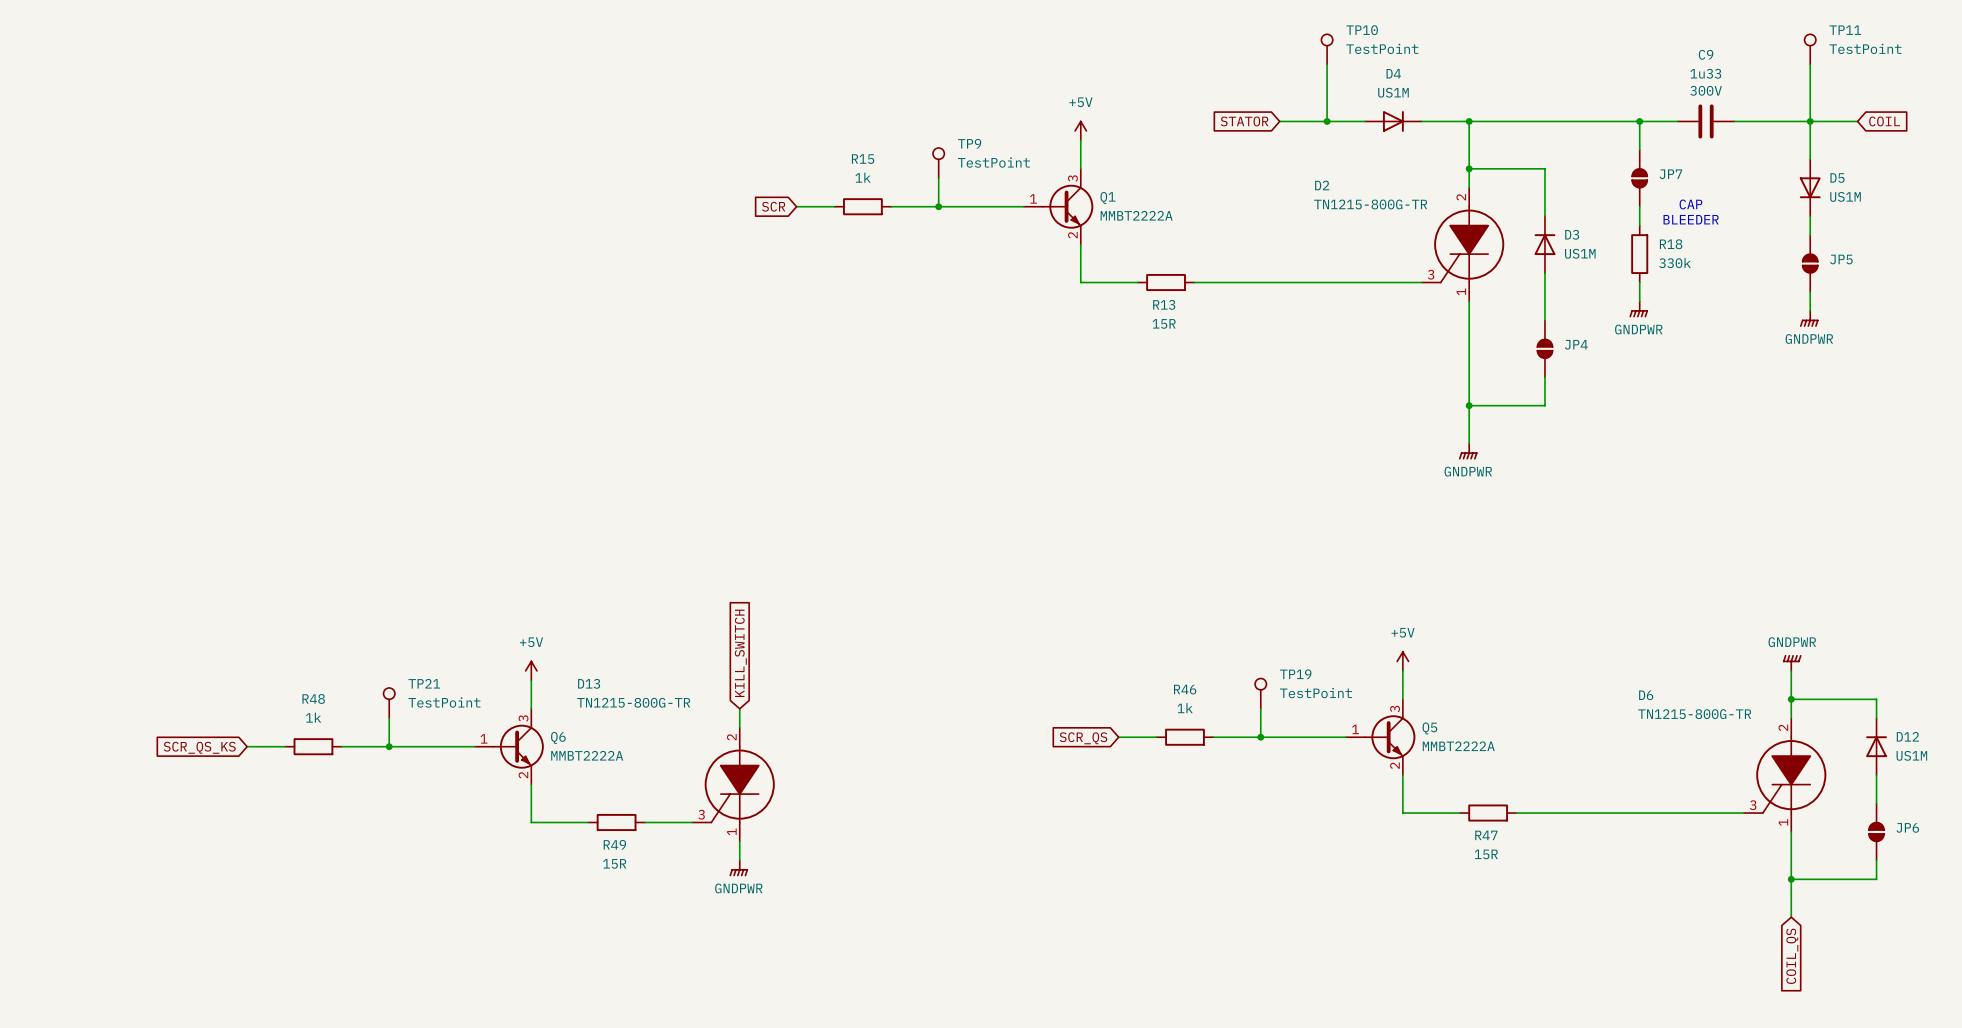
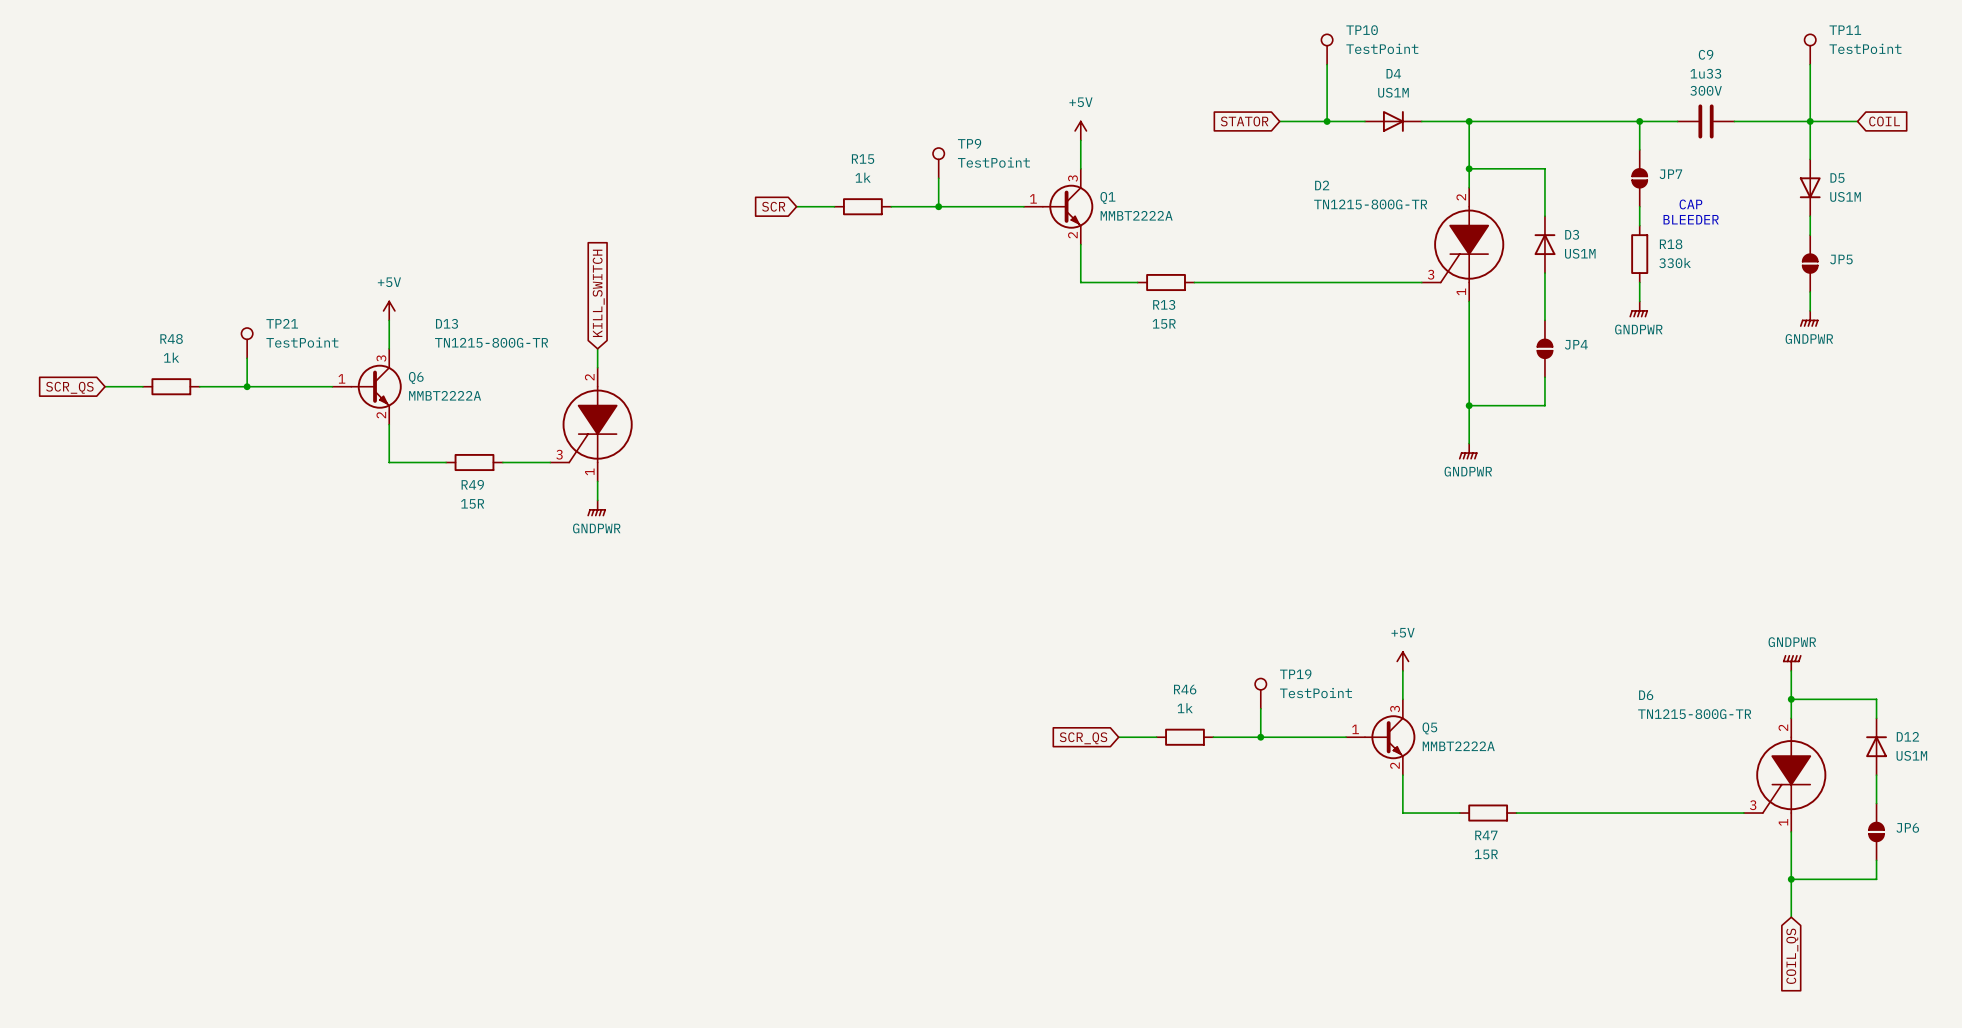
global label: none -> KILL_SWITCH (598, 293)
power symbol: none -> +5V (389, 310)
wire: none -> (389, 320) (389, 348)
wire: none -> (597, 348) (597, 367)
wire: none -> (247, 358) (247, 386)
wire: none -> (105, 386) (142, 386)
wire: none -> (199, 386) (332, 386)
junction: none -> (247, 386)
global label: none -> SCR_QS (69, 387)
wire: none -> (389, 424) (389, 462) (446, 462)
wire: none -> (502, 462) (550, 462)
wire: none -> (597, 481) (597, 500)
power symbol: none -> GNDPWR (596, 508)
global label: KILL_SWITCH (740, 653) -> none
power symbol: +5V (531, 670) -> none
wire: (531, 680) (531, 708) -> none
TP21 position: (389, 703) -> (247, 343)
wire: (739, 708) (739, 727) -> none
wire: (389, 718) (389, 746) -> none
wire: (247, 746) (285, 746) -> none
R48 position: (313, 746) -> (171, 386)
wire: (341, 746) (474, 746) -> none
junction: (389, 746) -> none
Q6 position: (509, 746) -> (367, 386)
global label: SCR_QS_KS (199, 747) -> none
wire: (531, 784) (531, 822) (588, 822) -> none
D13 position: (733, 784) -> (591, 424)
R49 position: (616, 822) -> (474, 462)
wire: (645, 822) (692, 822) -> none
wire: (739, 841) (739, 860) -> none
power symbol: GNDPWR (738, 868) -> none

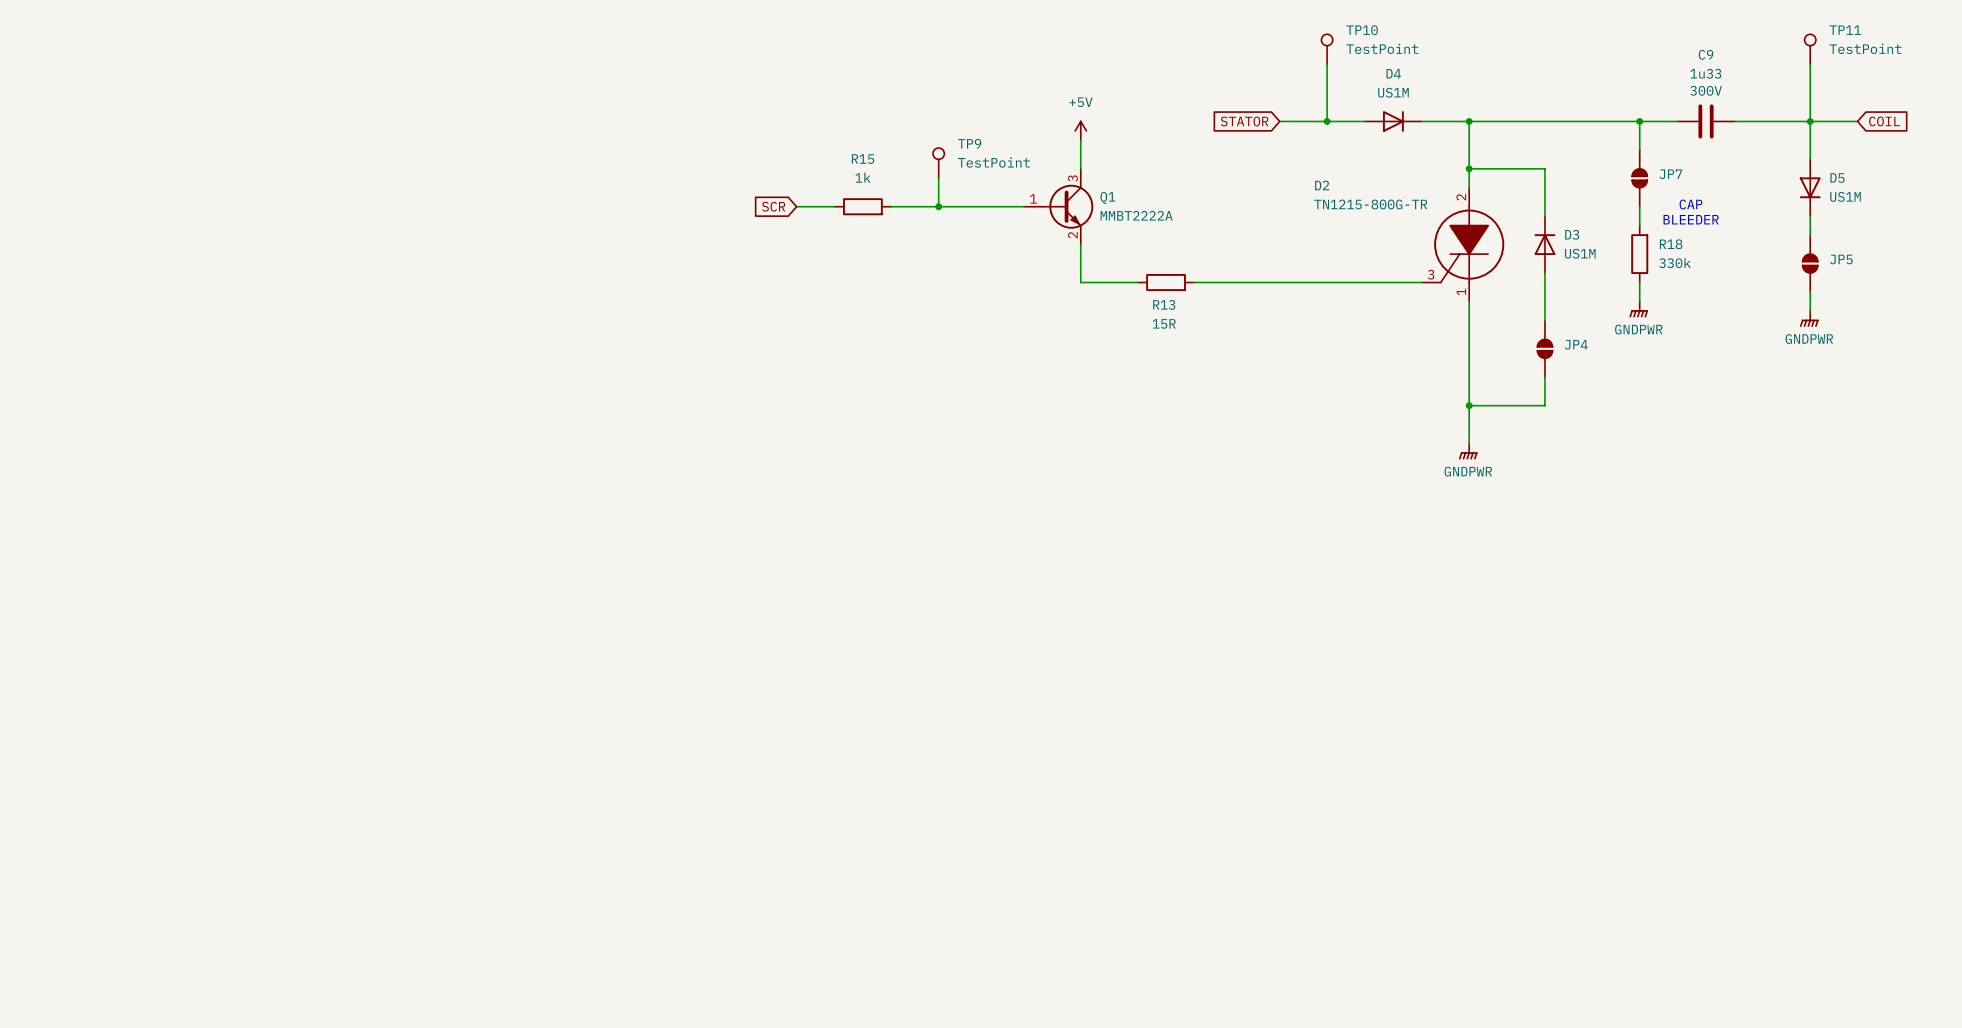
global label: KILL_SWITCH (598, 293) -> none
power symbol: +5V (389, 310) -> none
wire: (389, 320) (389, 348) -> none
TP21: TestPoint (247, 343) -> none
wire: (597, 348) (597, 367) -> none
wire: (247, 358) (247, 386) -> none
wire: (105, 386) (142, 386) -> none
R48: 1k (171, 386) -> none
wire: (199, 386) (332, 386) -> none
junction: (247, 386) -> none
Q6: MMBT2222A (367, 386) -> none
global label: SCR_QS (69, 387) -> none
wire: (389, 424) (389, 462) (446, 462) -> none
D13: TN1215-800G-TR (591, 424) -> none
R49: 15R (474, 462) -> none
wire: (502, 462) (550, 462) -> none
wire: (597, 481) (597, 500) -> none
power symbol: GNDPWR (596, 508) -> none
power symbol: +5V (1402, 661) -> none
power symbol: GNDPWR (1792, 662) -> none
wire: (1402, 670) (1402, 699) -> none
wire: (1791, 670) (1791, 718) -> none
TP19: TestPoint (1260, 693) -> none
wire: (1791, 699) (1876, 699) (1876, 718) -> none
junction: (1791, 699) -> none
wire: (1260, 708) (1260, 737) -> none
wire: (1118, 737) (1156, 737) -> none
R46: 1k (1184, 737) -> none
wire: (1213, 737) (1346, 737) -> none
junction: (1260, 737) -> none
Q5: MMBT2222A (1380, 737) -> none
global label: SCR_QS (1083, 738) -> none
D12: US1M (1876, 746) -> none
wire: (1402, 775) (1402, 813) (1459, 813) -> none
D6: TN1215-800G-TR (1785, 775) -> none
wire: (1876, 775) (1876, 803) -> none
R47: 15R (1488, 813) -> none
wire: (1516, 813) (1743, 813) -> none
wire: (1791, 831) (1791, 917) -> none
JP6: (1876, 831) -> none
wire: (1876, 860) (1876, 879) (1791, 879) -> none
junction: (1791, 879) -> none
global label: COIL_QS (1792, 956) -> none

